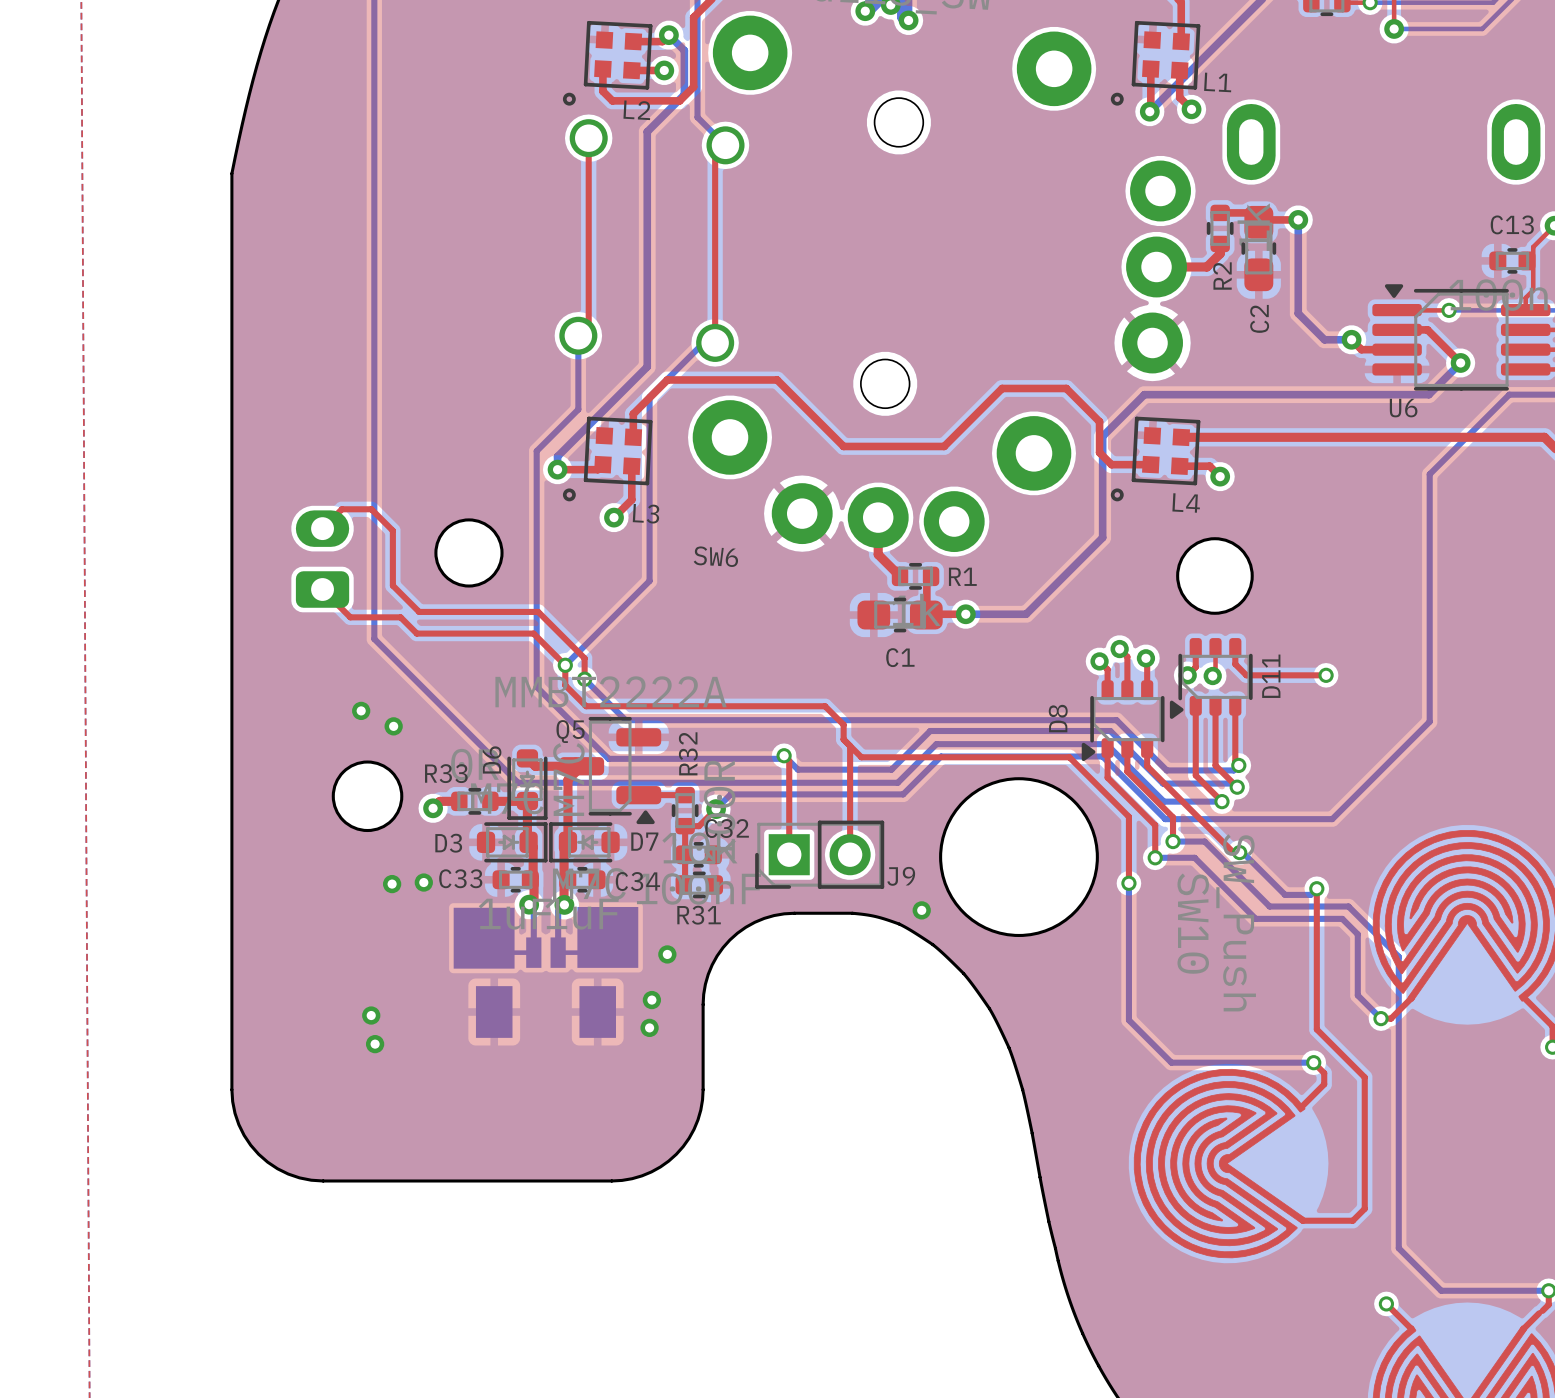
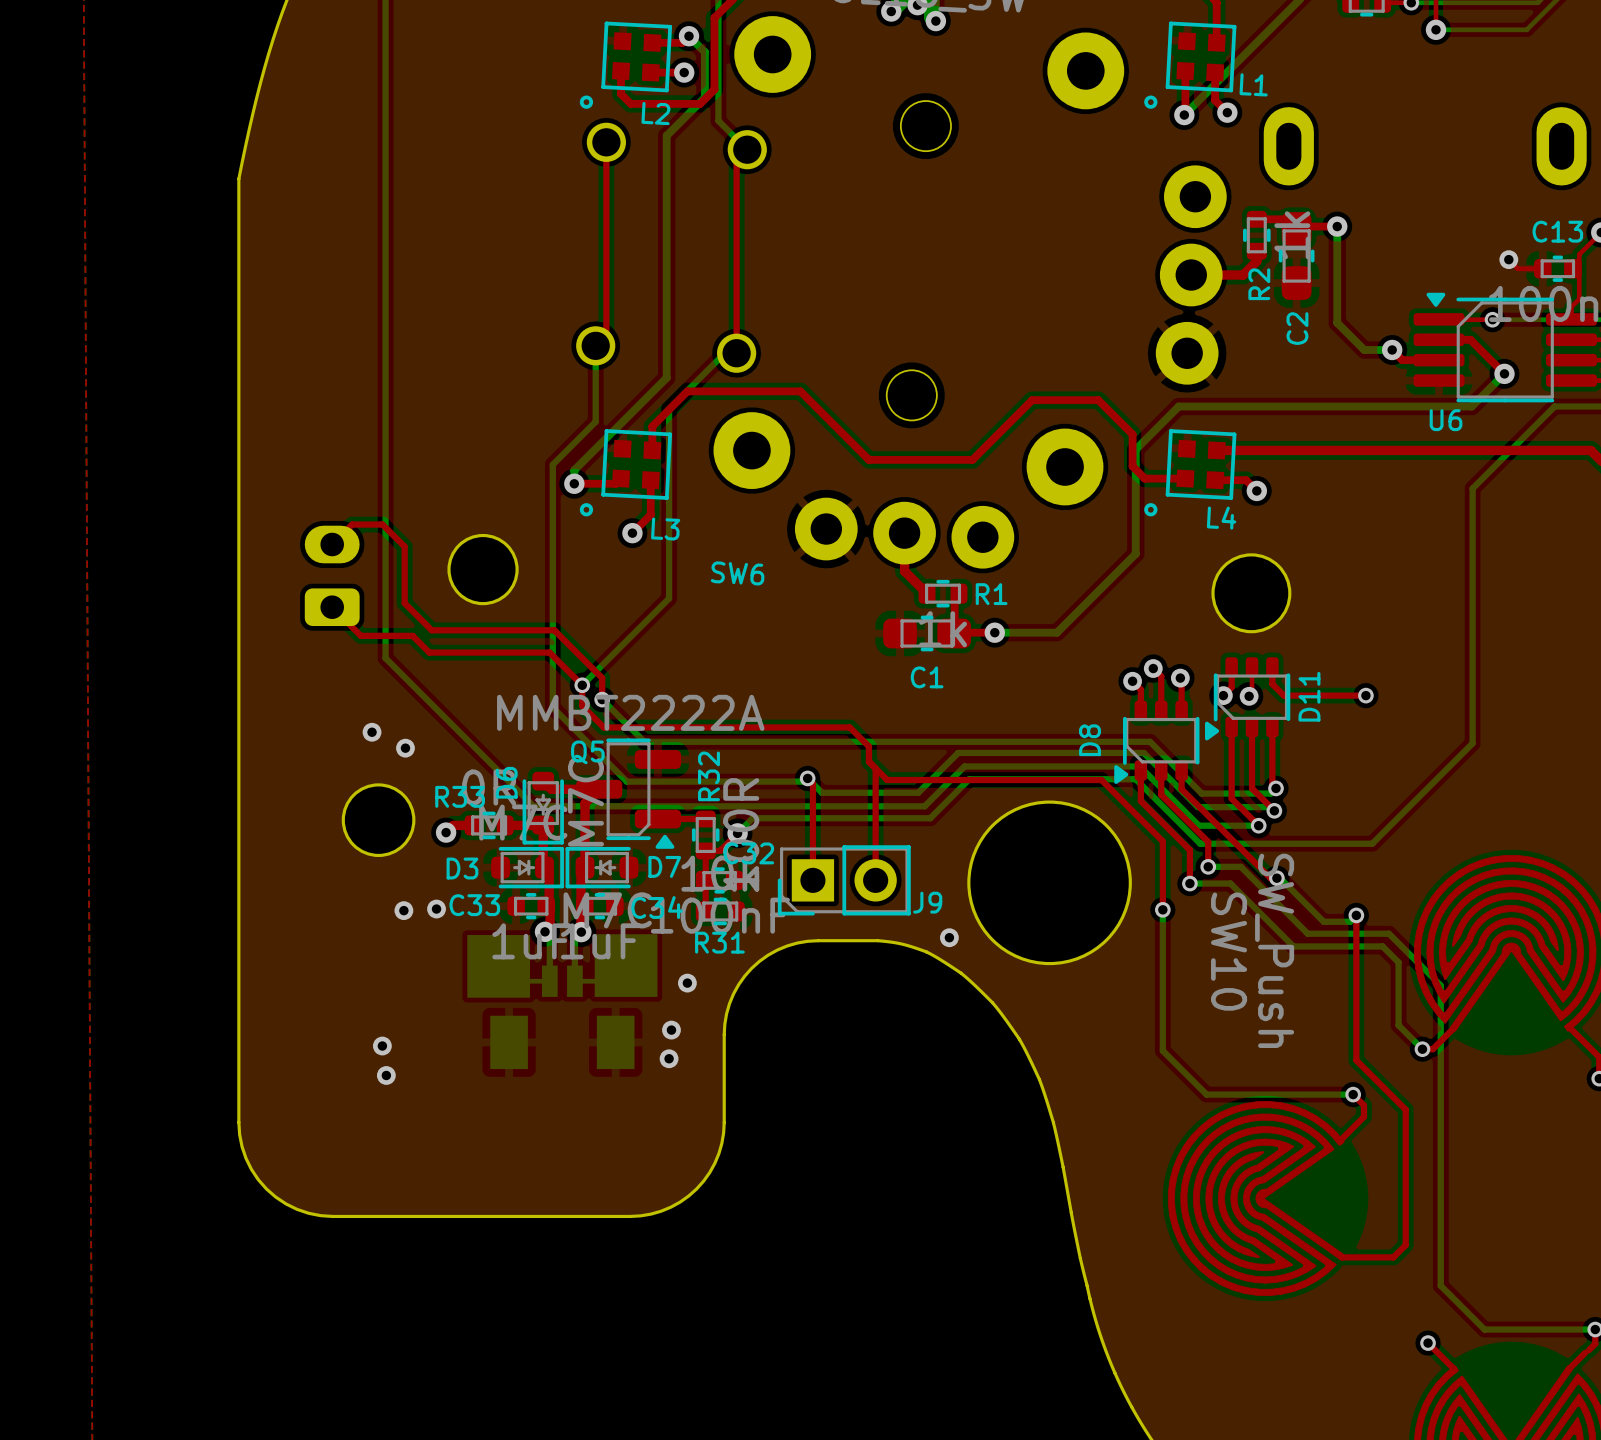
top track: none -> (1508, 259) (1517, 268) (1542, 268)
via: none -> (1508, 259)

